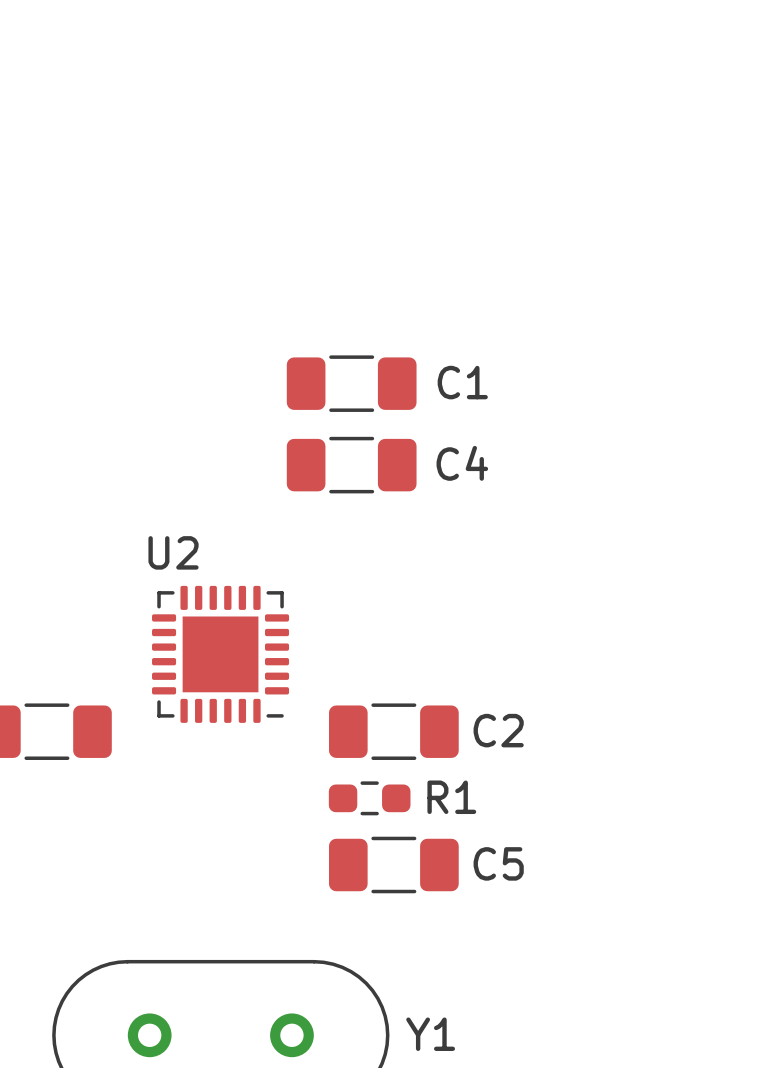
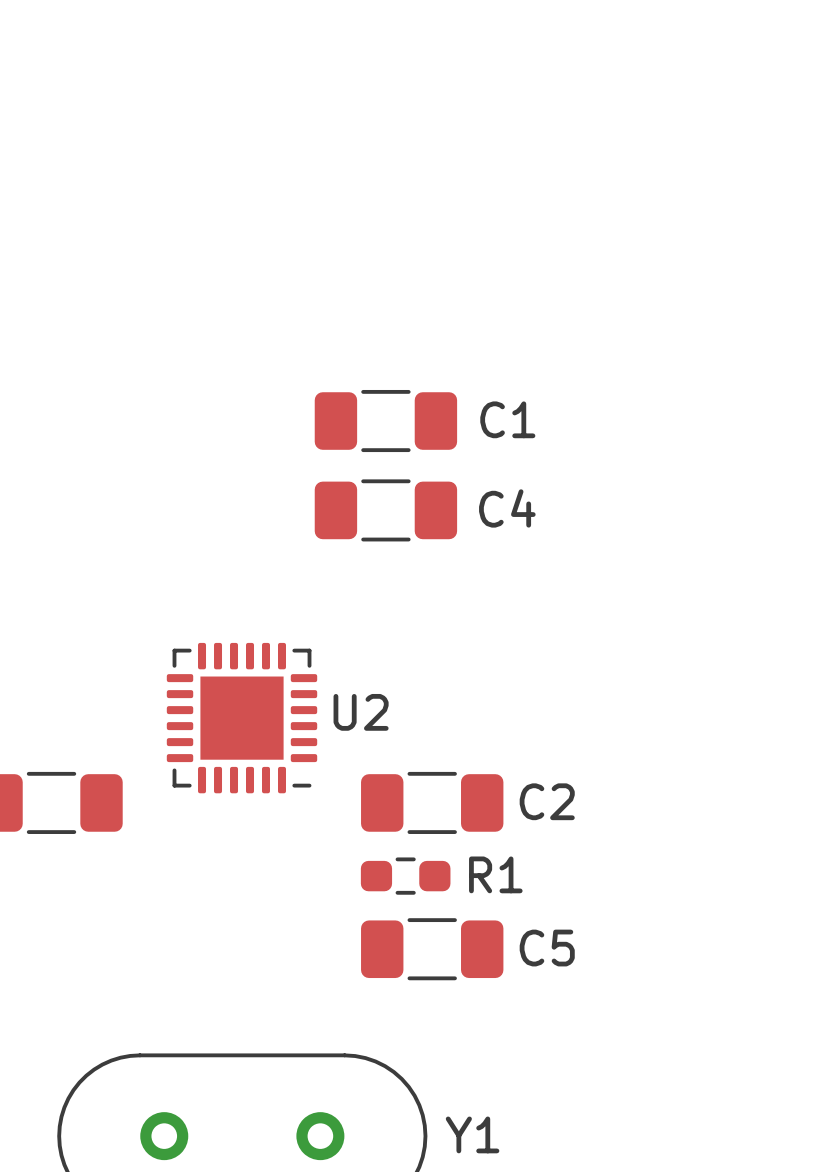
U2 name position: U2 (173, 552) -> U2 (361, 712)

